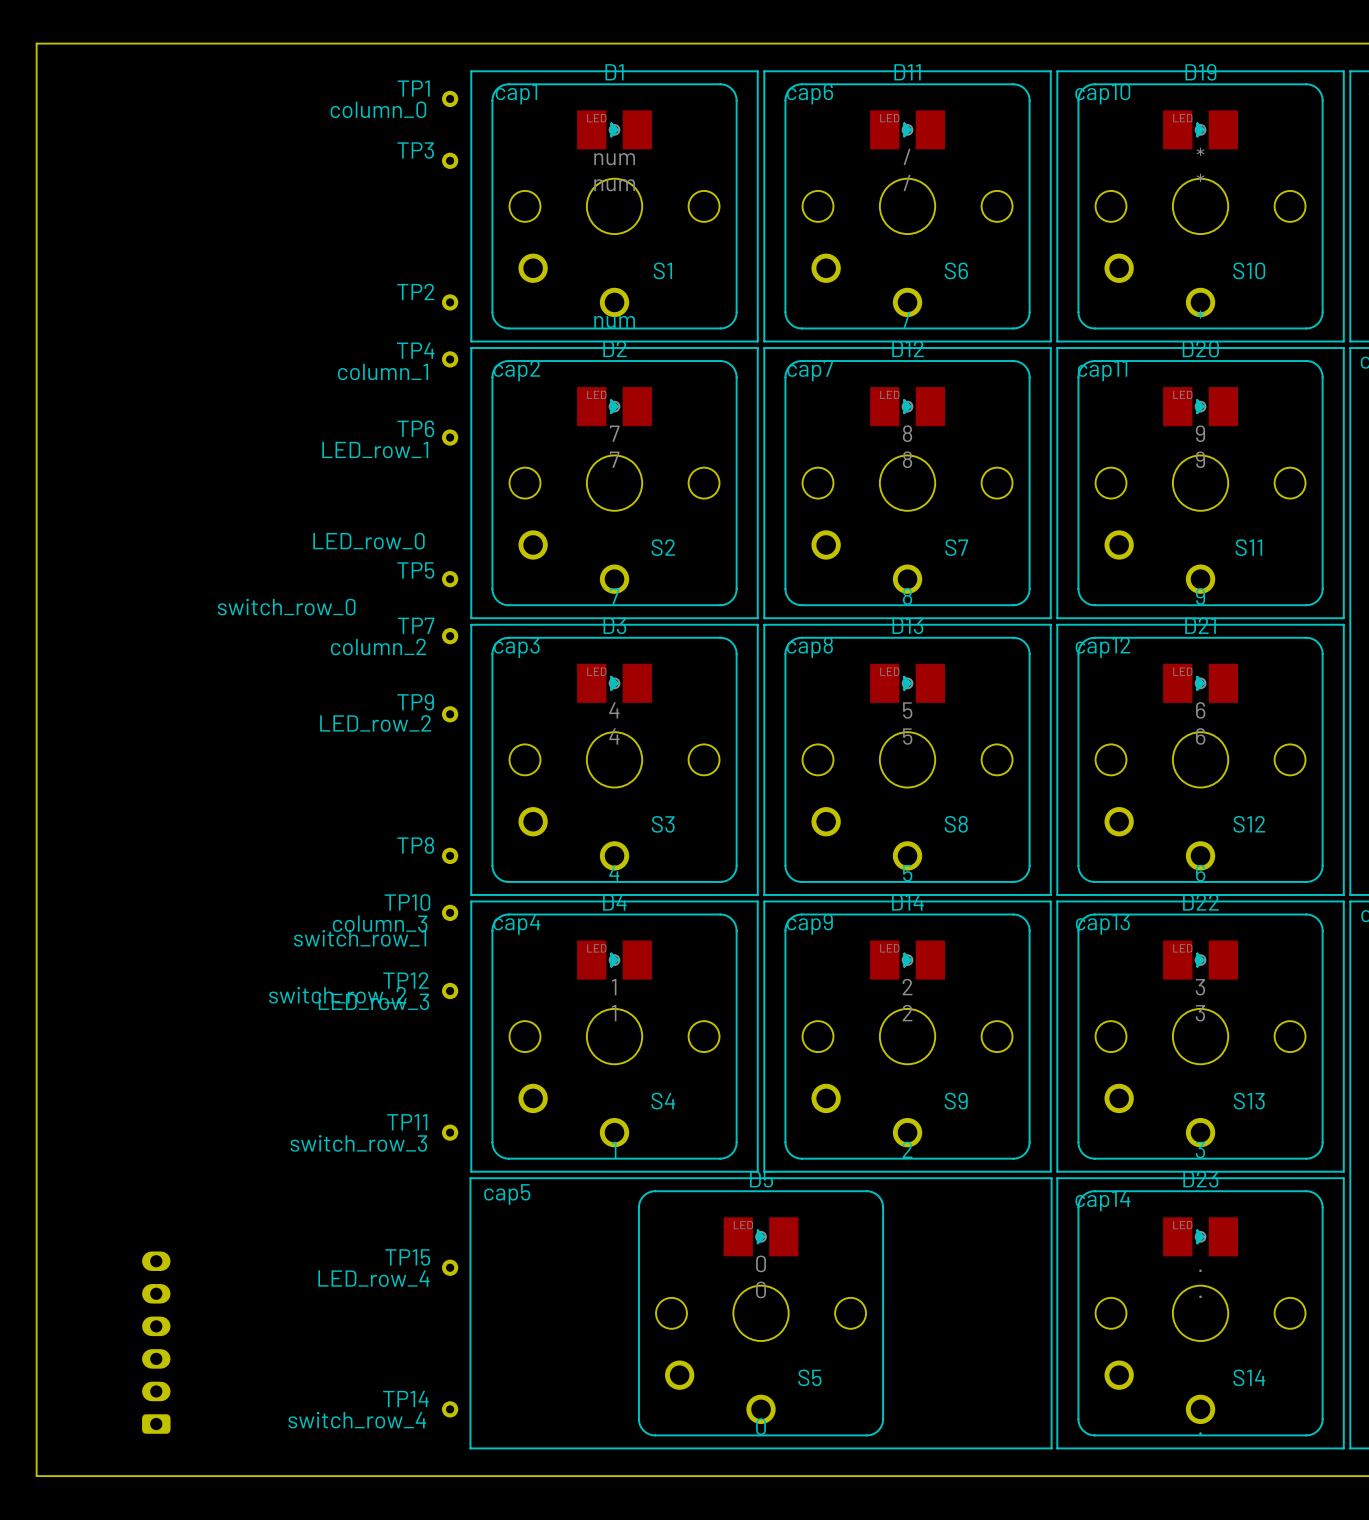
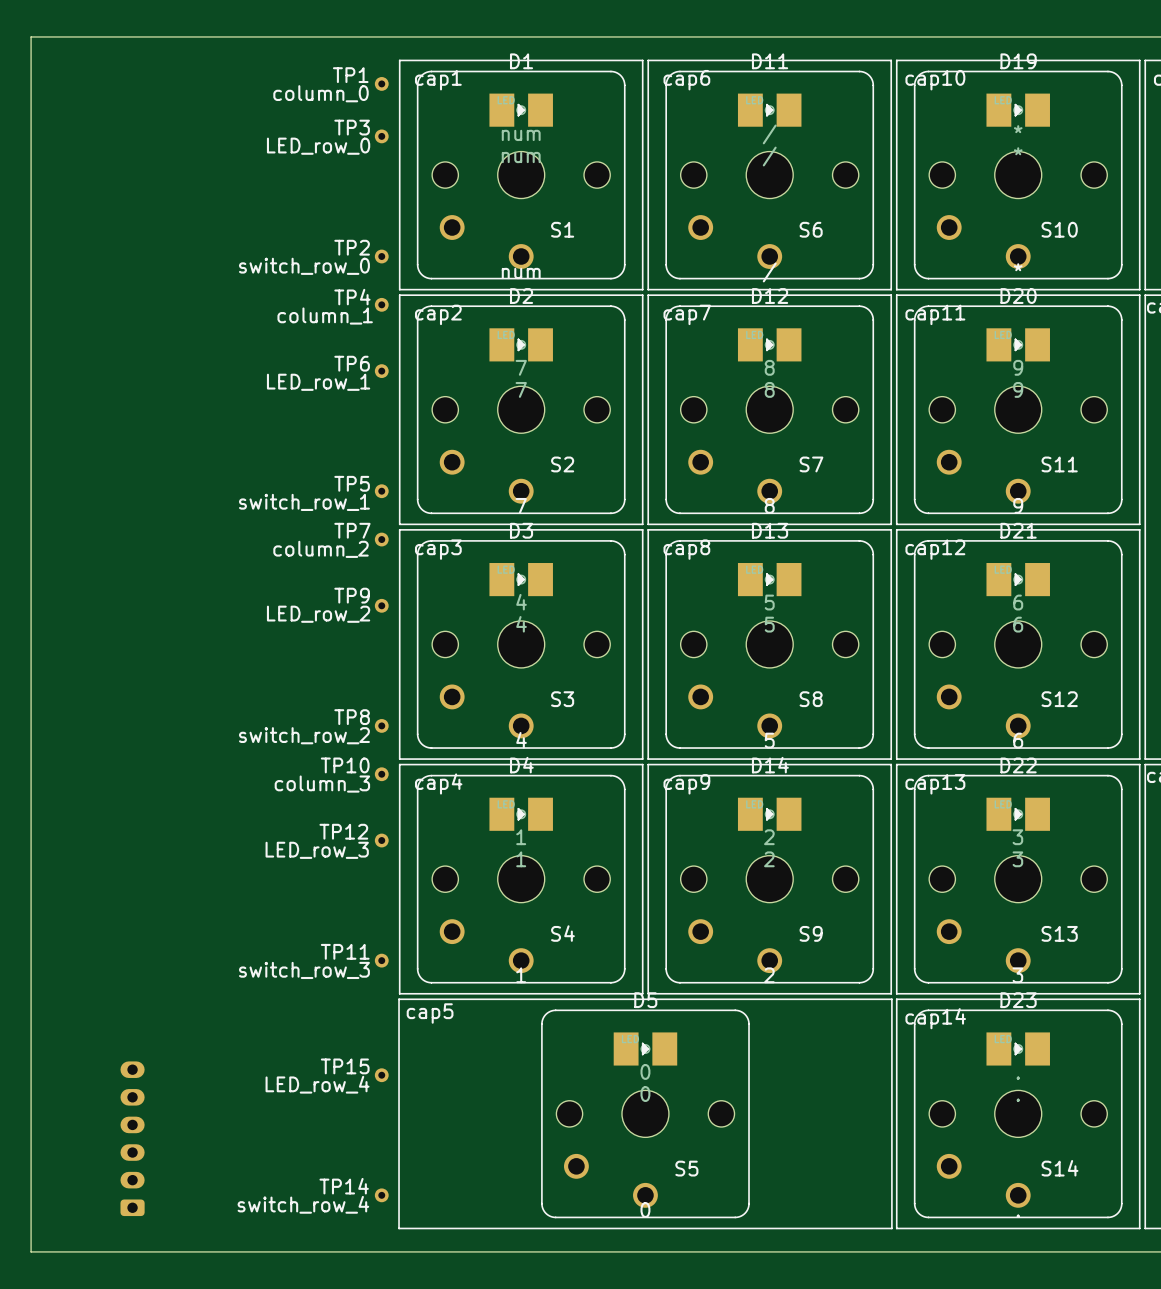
TP3 value position: LED_row_0 (368, 541) -> LED_row_0 (318, 146)
TP2 value position: switch_row_0 (286, 607) -> switch_row_0 (304, 266)
TP5 value position: switch_row_1 (360, 938) -> switch_row_1 (304, 502)
TP8 value position: switch_row_2 (337, 995) -> switch_row_2 (304, 735)

